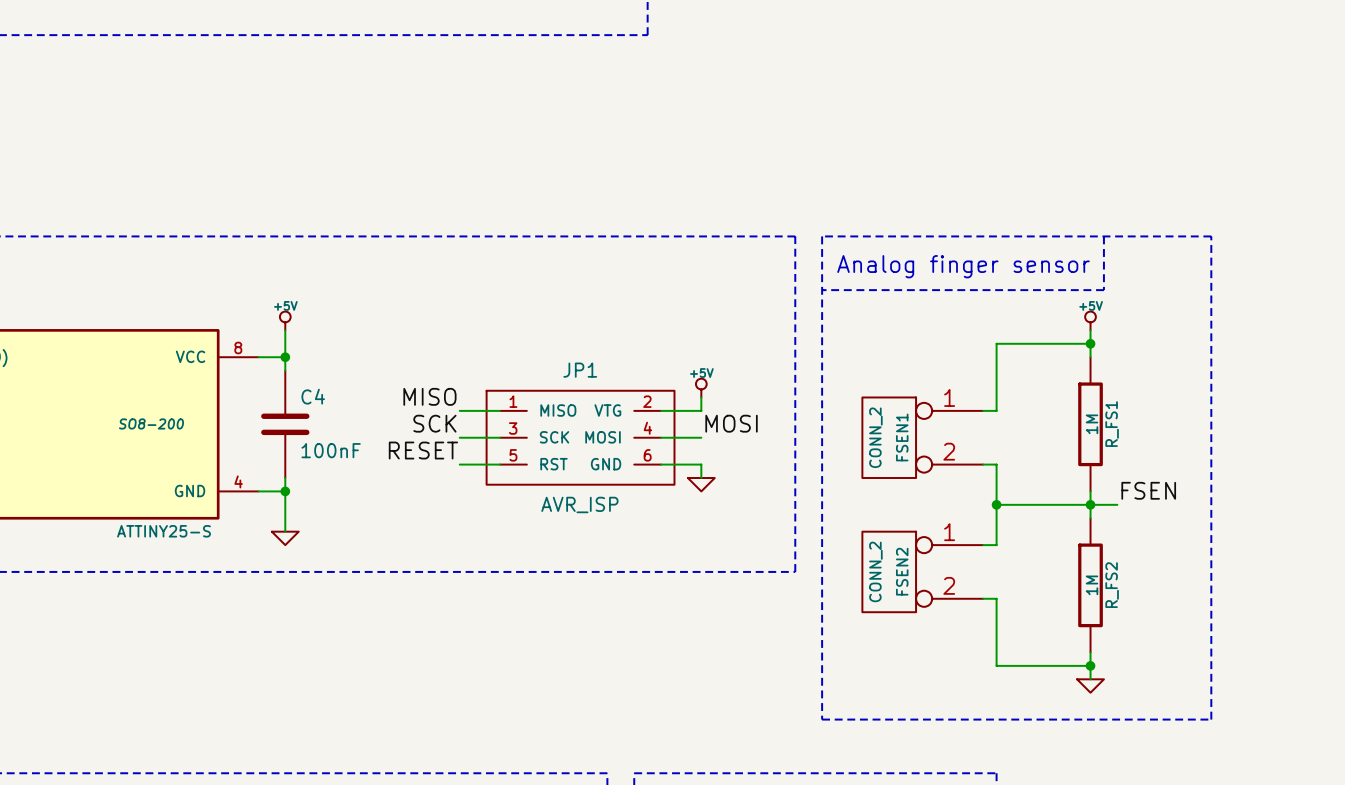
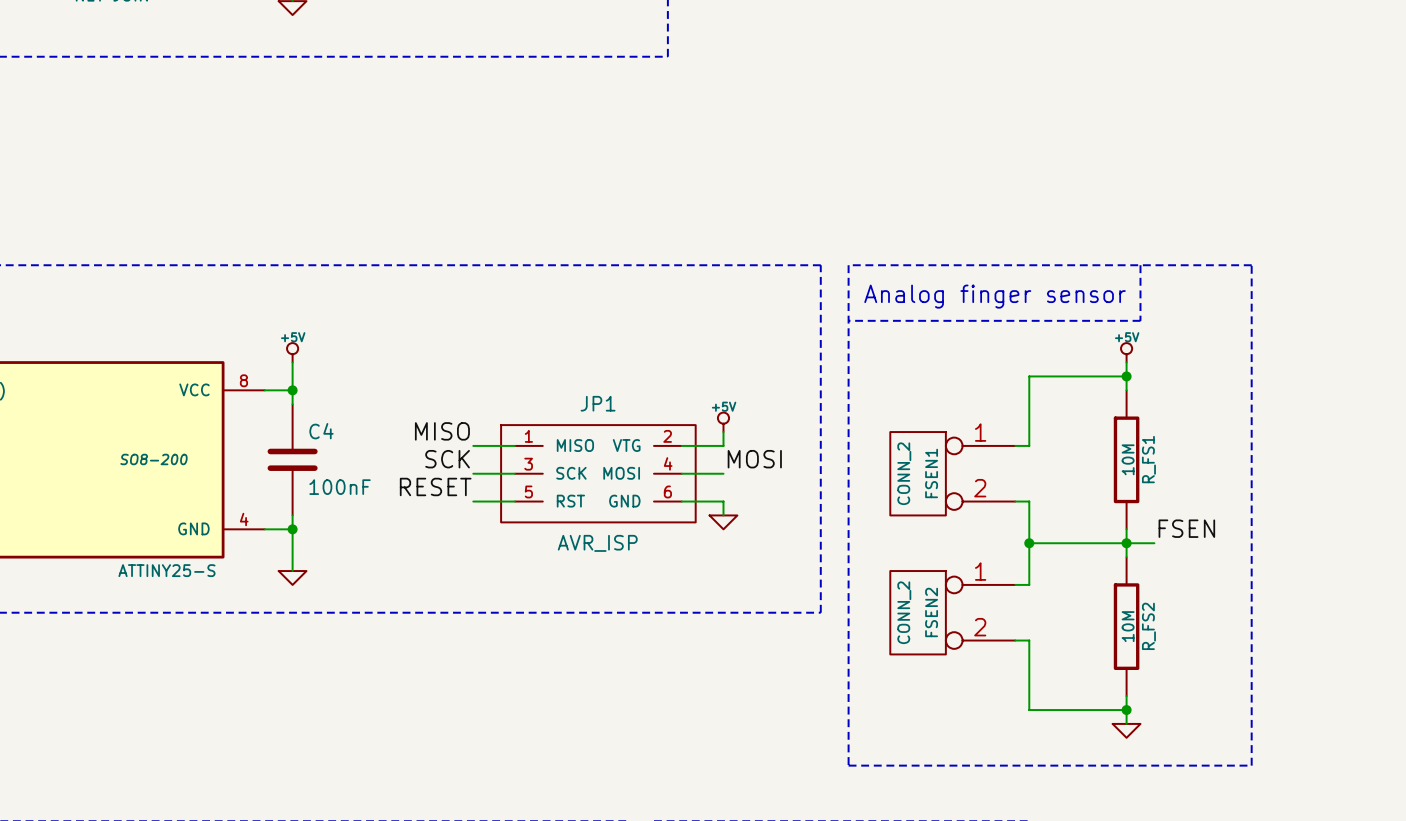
R_FS1 value: 1M (1092, 424) -> 10M (1128, 459)
R_FS2 value: 1M (1092, 585) -> 10M (1128, 626)

